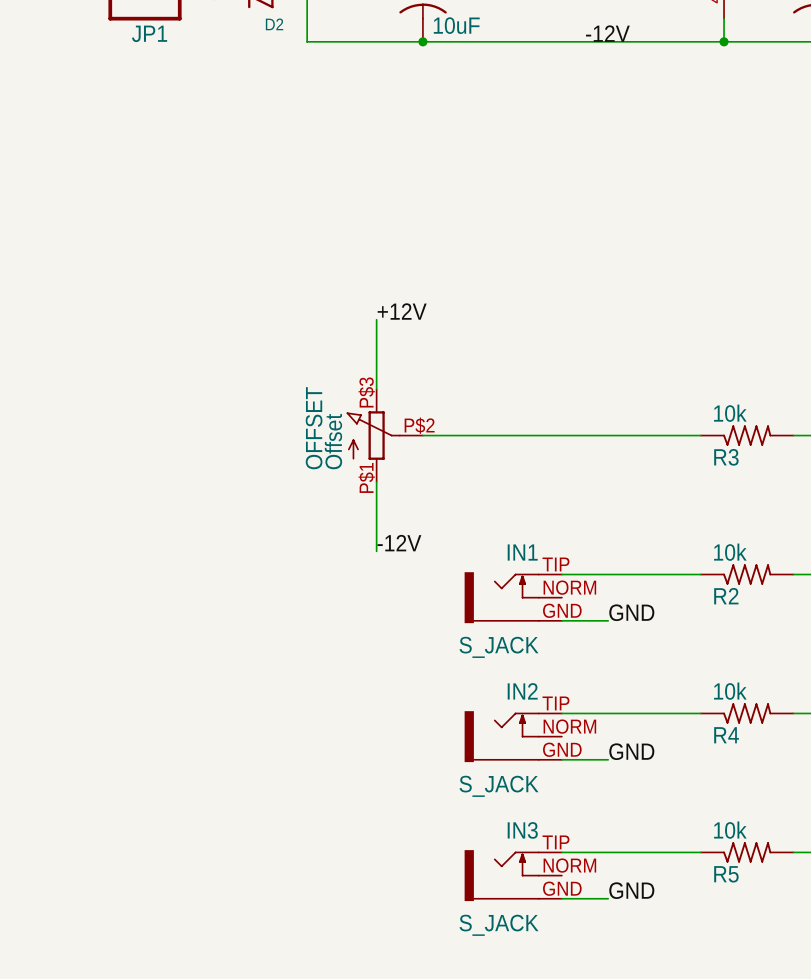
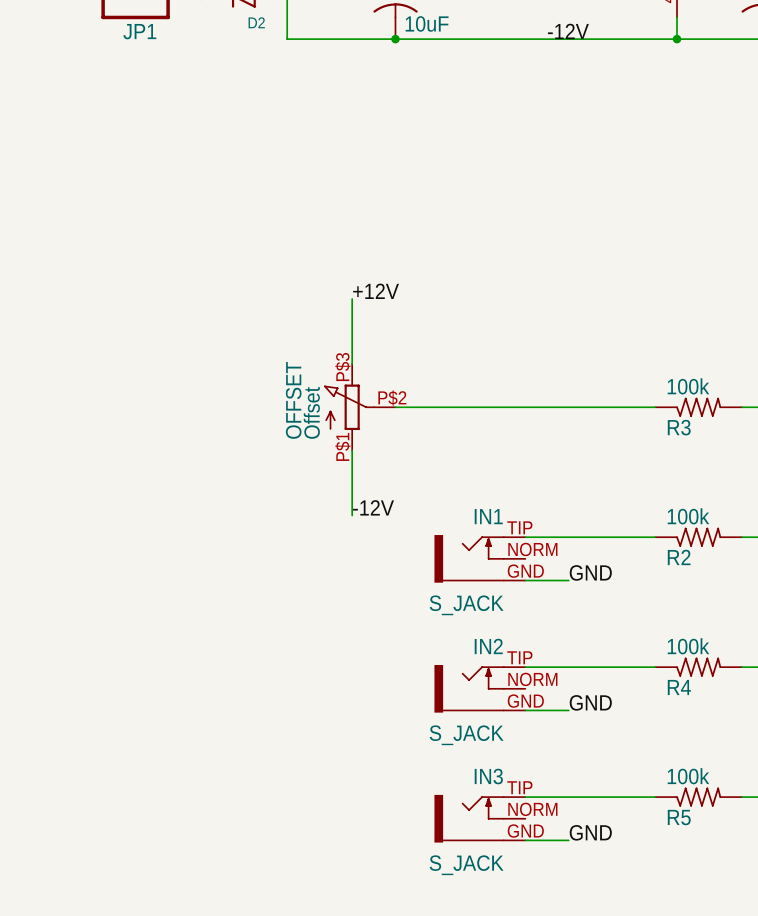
R3 value: 10k (730, 413) -> 100k (688, 386)
R2 value: 10k (730, 552) -> 100k (688, 516)
R4 value: 10k (730, 691) -> 100k (688, 646)
R5 value: 10k (730, 830) -> 100k (688, 776)

